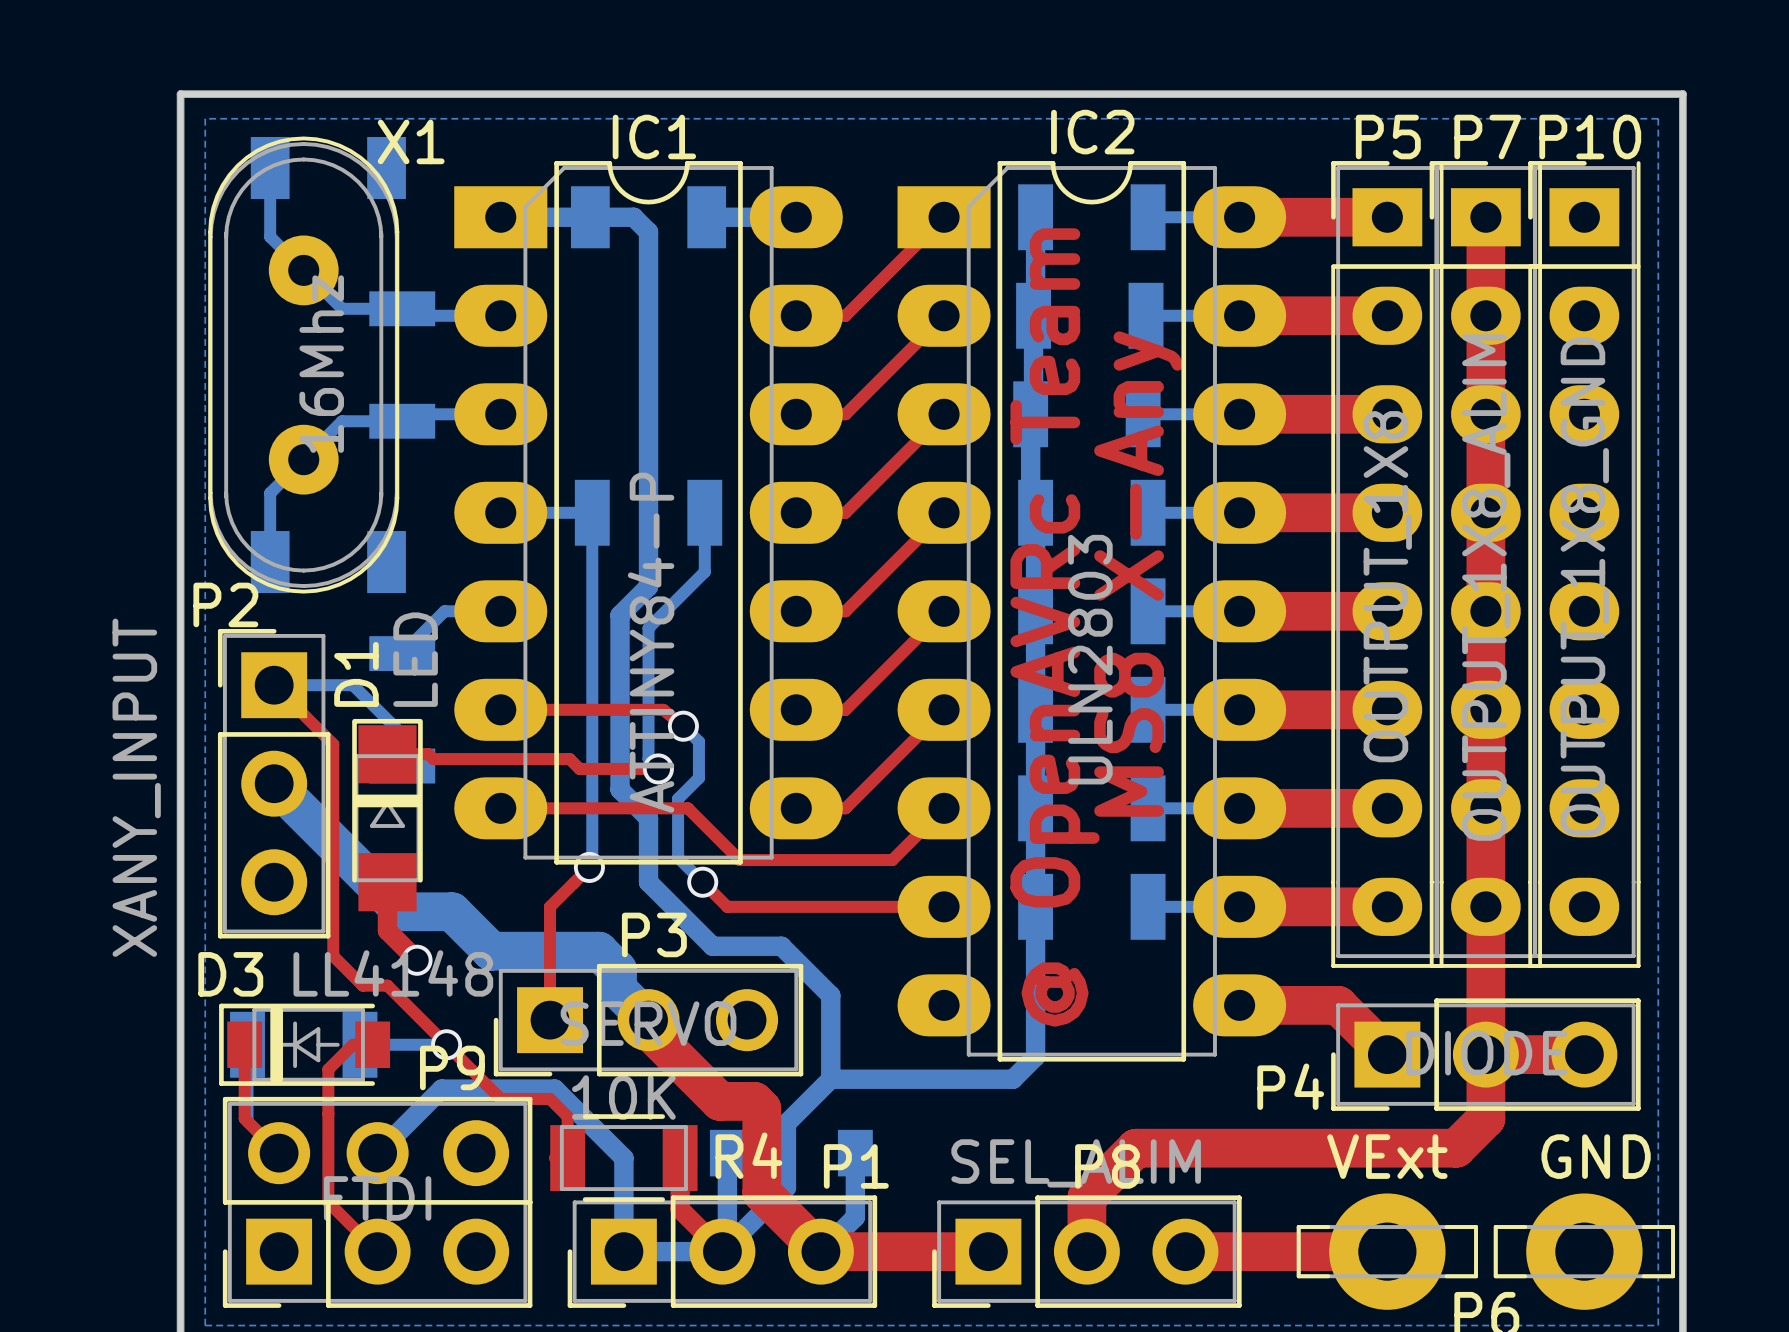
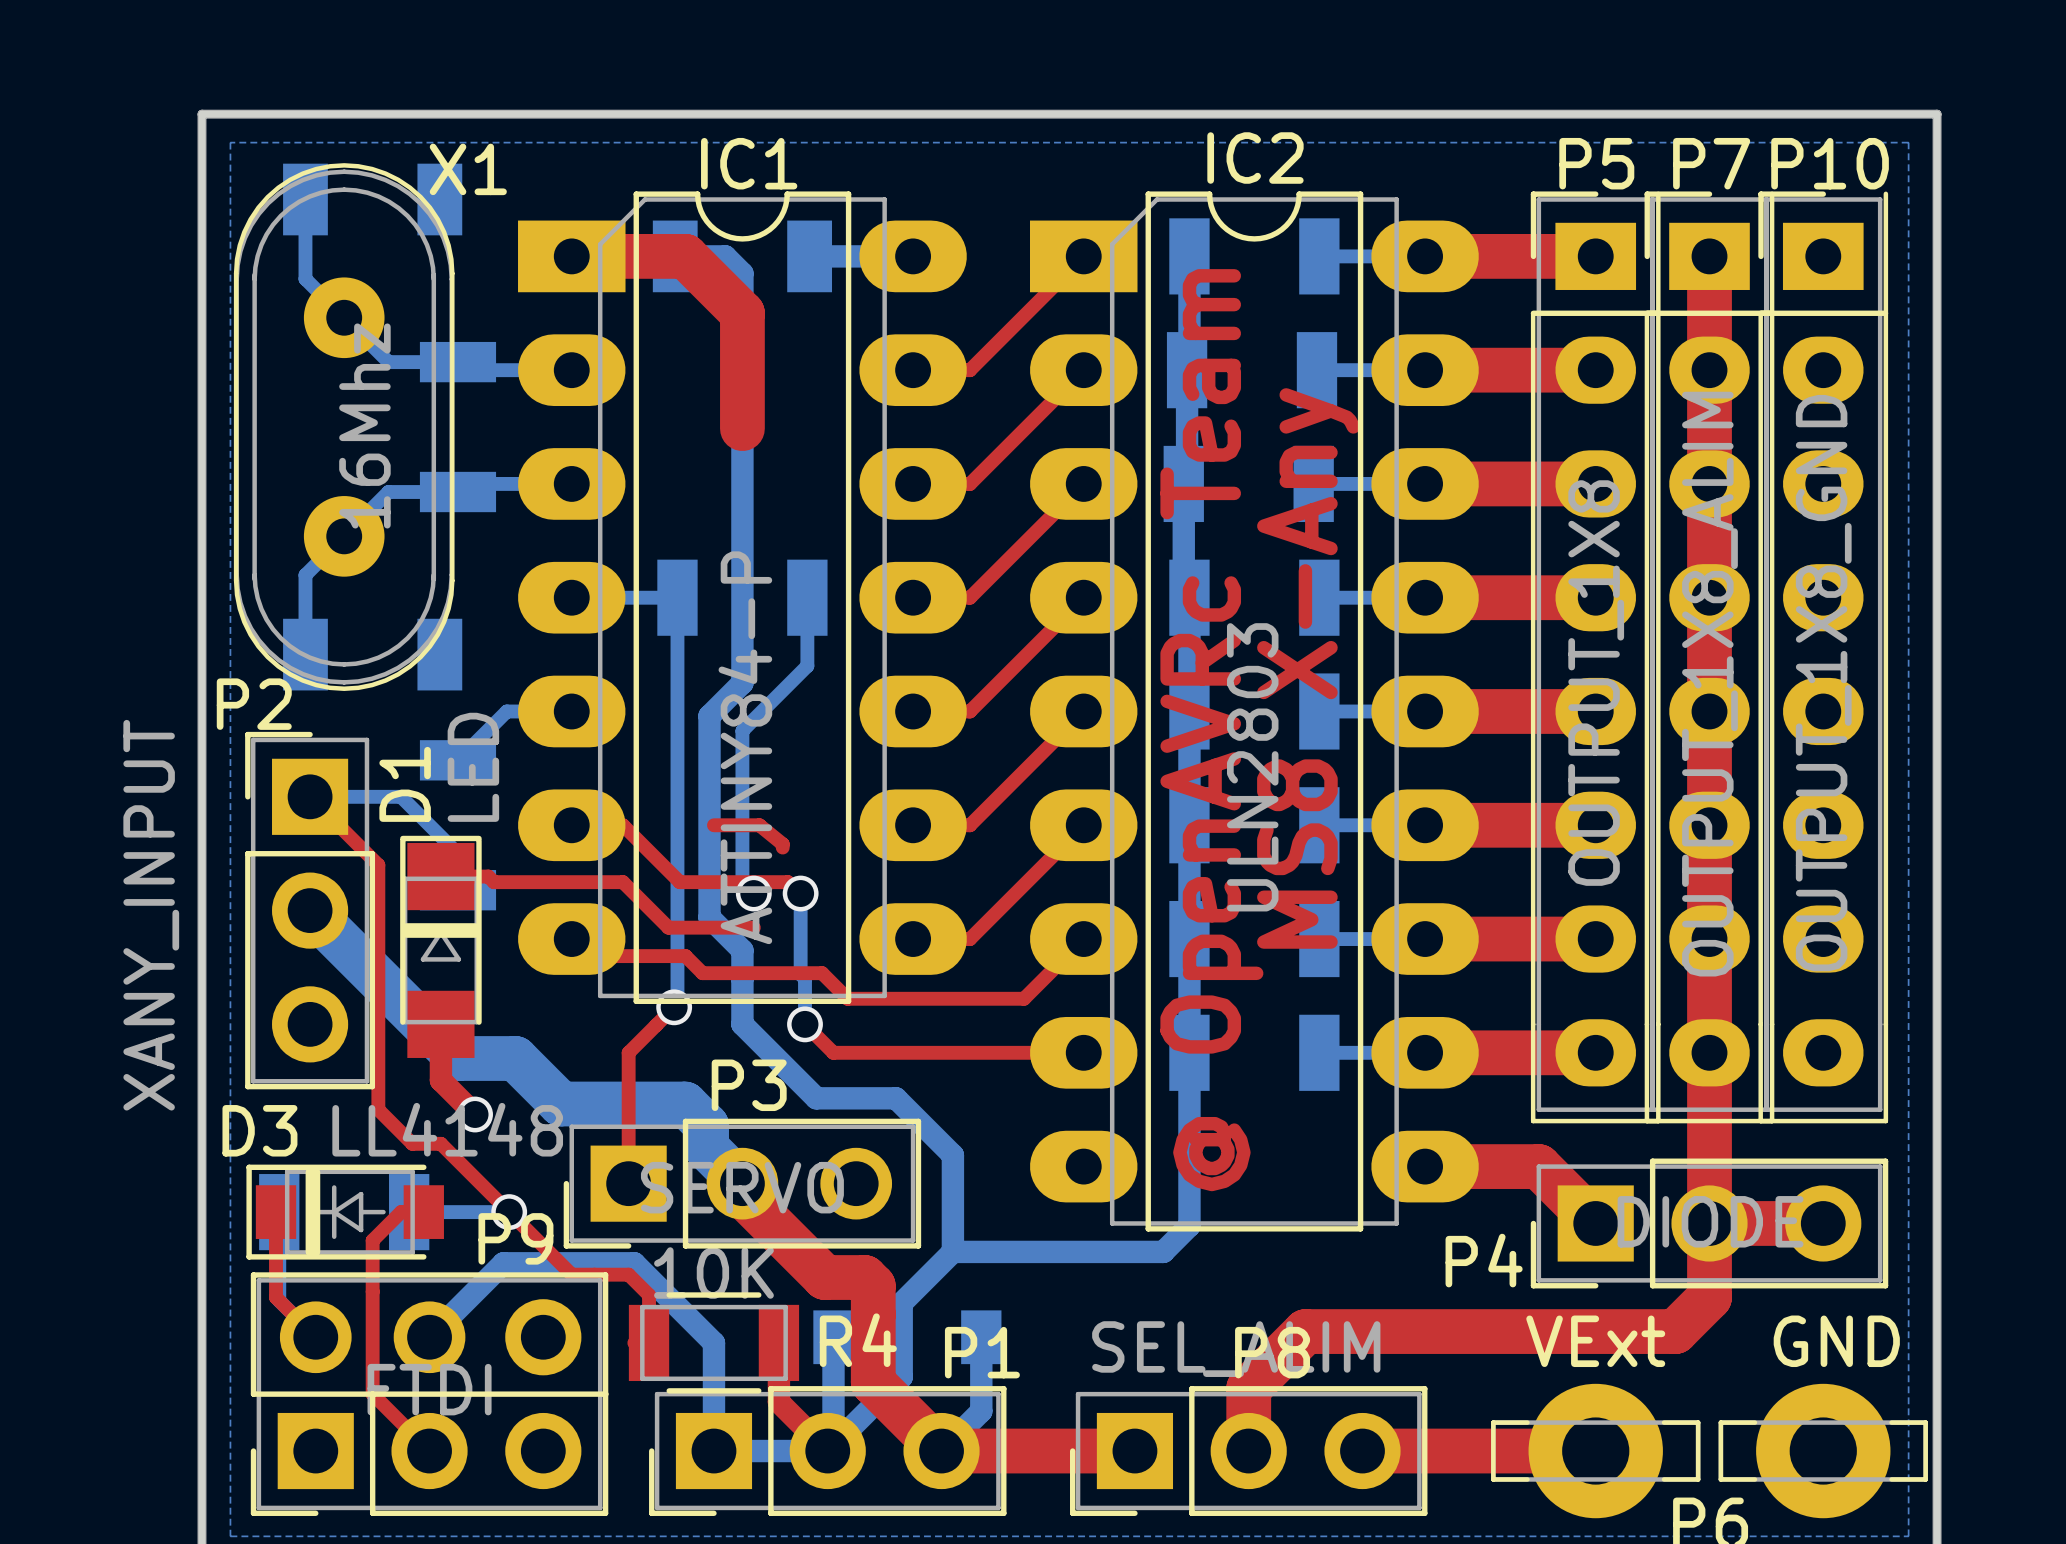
top track: none -> (571, 256) (685, 256) (742, 313) (742, 428)
top track: (545, 709) (623, 709) -> (622, 825) (679, 882) (787, 882) (800, 893)
bottom track: (683, 726) (698, 741) (698, 768) -> none
via position: (683, 726) -> (800, 893)
top track: (545, 759) (569, 759) (579, 768) (658, 768) -> (622, 882) (668, 927) (753, 927)
bottom track: (698, 778) (678, 798) (678, 857) (702, 882) -> (800, 904) (800, 974) (805, 978) (805, 1024)
top track: (500, 808) (687, 808) (717, 837) -> (571, 939) (588, 956) (685, 956) (702, 973) (822, 973)

